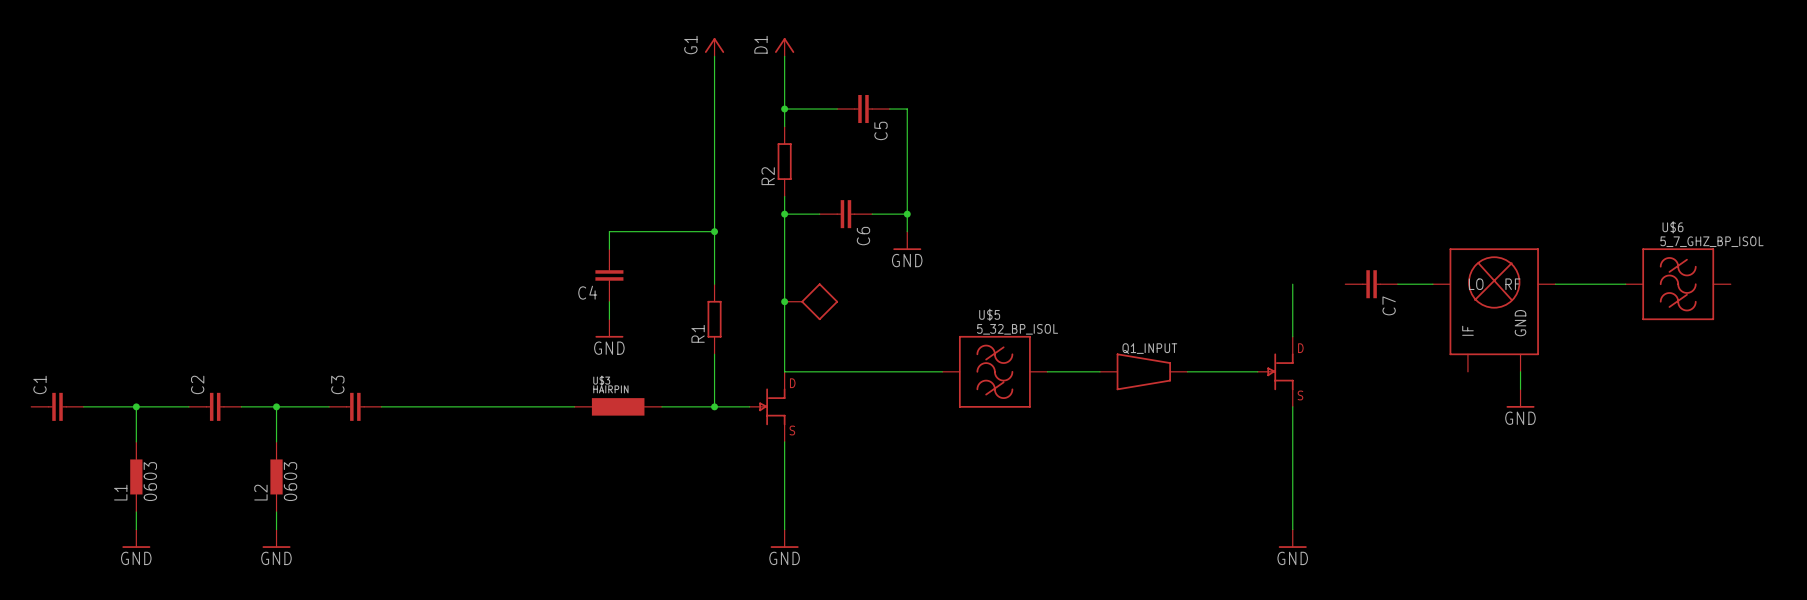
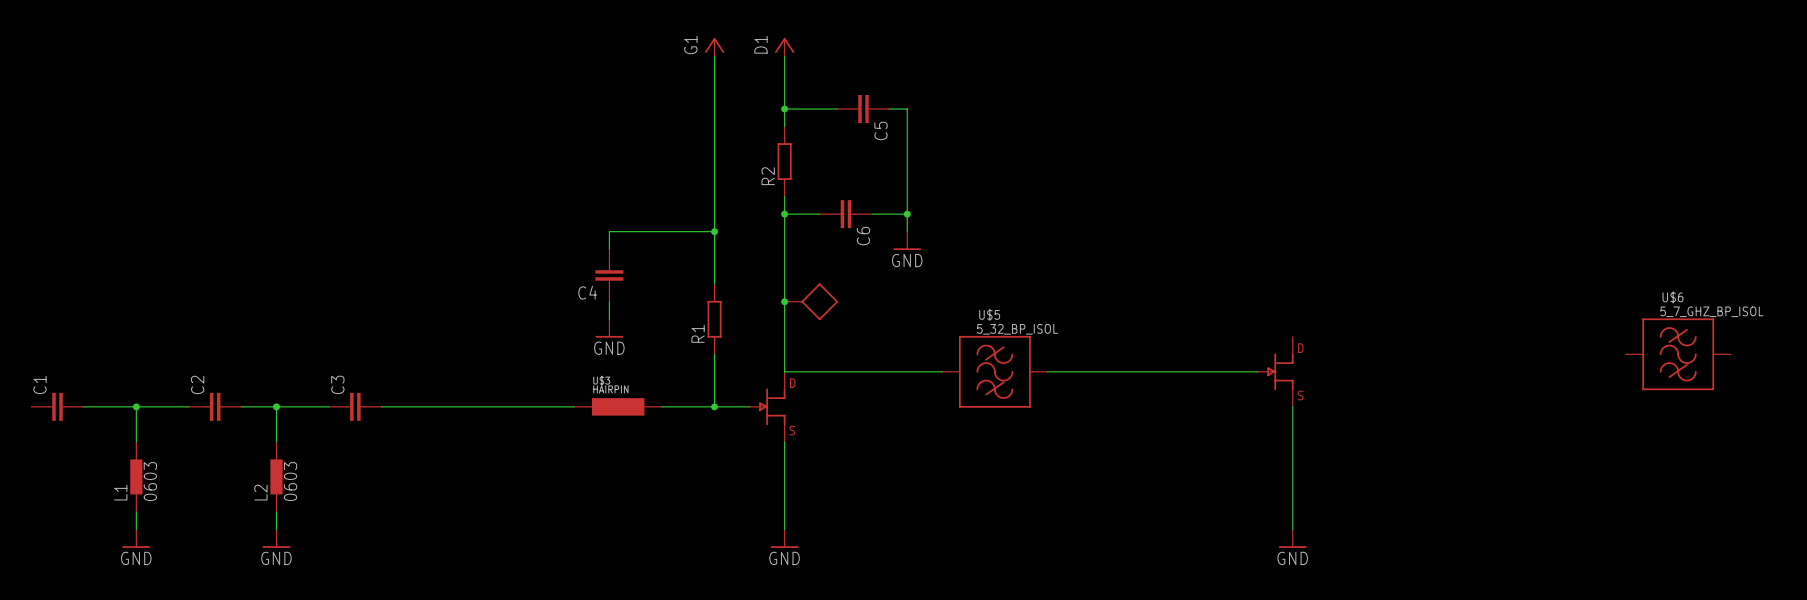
wire: (1292, 284) (1292, 336) -> none
C7: (1371, 284) -> none
wire: (1397, 284) (1432, 284) -> none
wire: (1555, 284) (1625, 284) -> none
U$6 position: (1678, 284) -> (1678, 354)
part: (1494, 310) -> none
wire: none -> (1100, 371) (1187, 371)
part: Q1_INPUT (1143, 371) -> none
wire: (1520, 371) (1520, 389) -> none
power symbol: GND (1520, 398) -> none

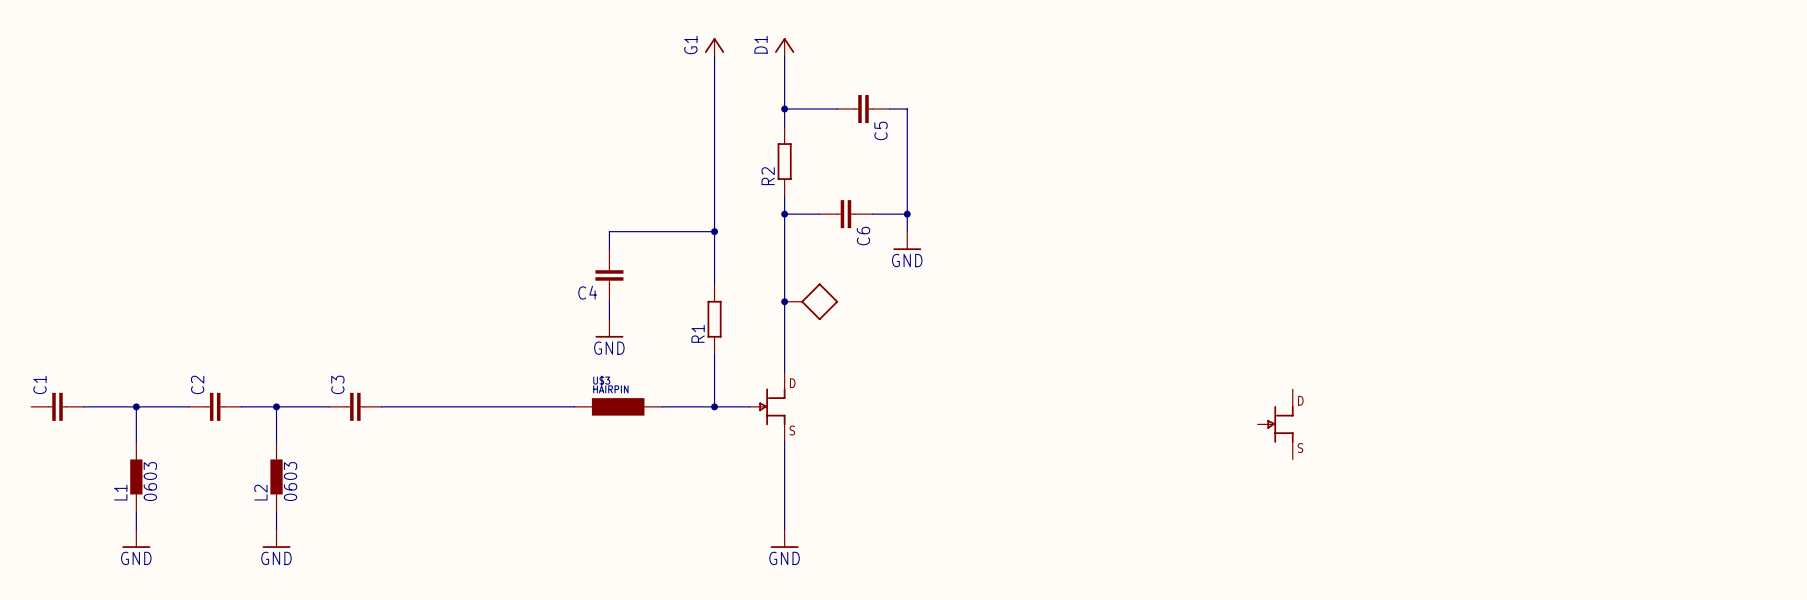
U$6: 5_7_GHZ_BP_ISOL (1678, 354) -> none
wire: (784, 371) (942, 371) -> none
U$5: 5_32_BP_ISOL (994, 371) -> none
wire: (1047, 371) (1257, 371) -> none
part position: (1275, 371) -> (1275, 424)
wire: (1292, 406) (1292, 529) -> none
power symbol: GND (1292, 538) -> none

